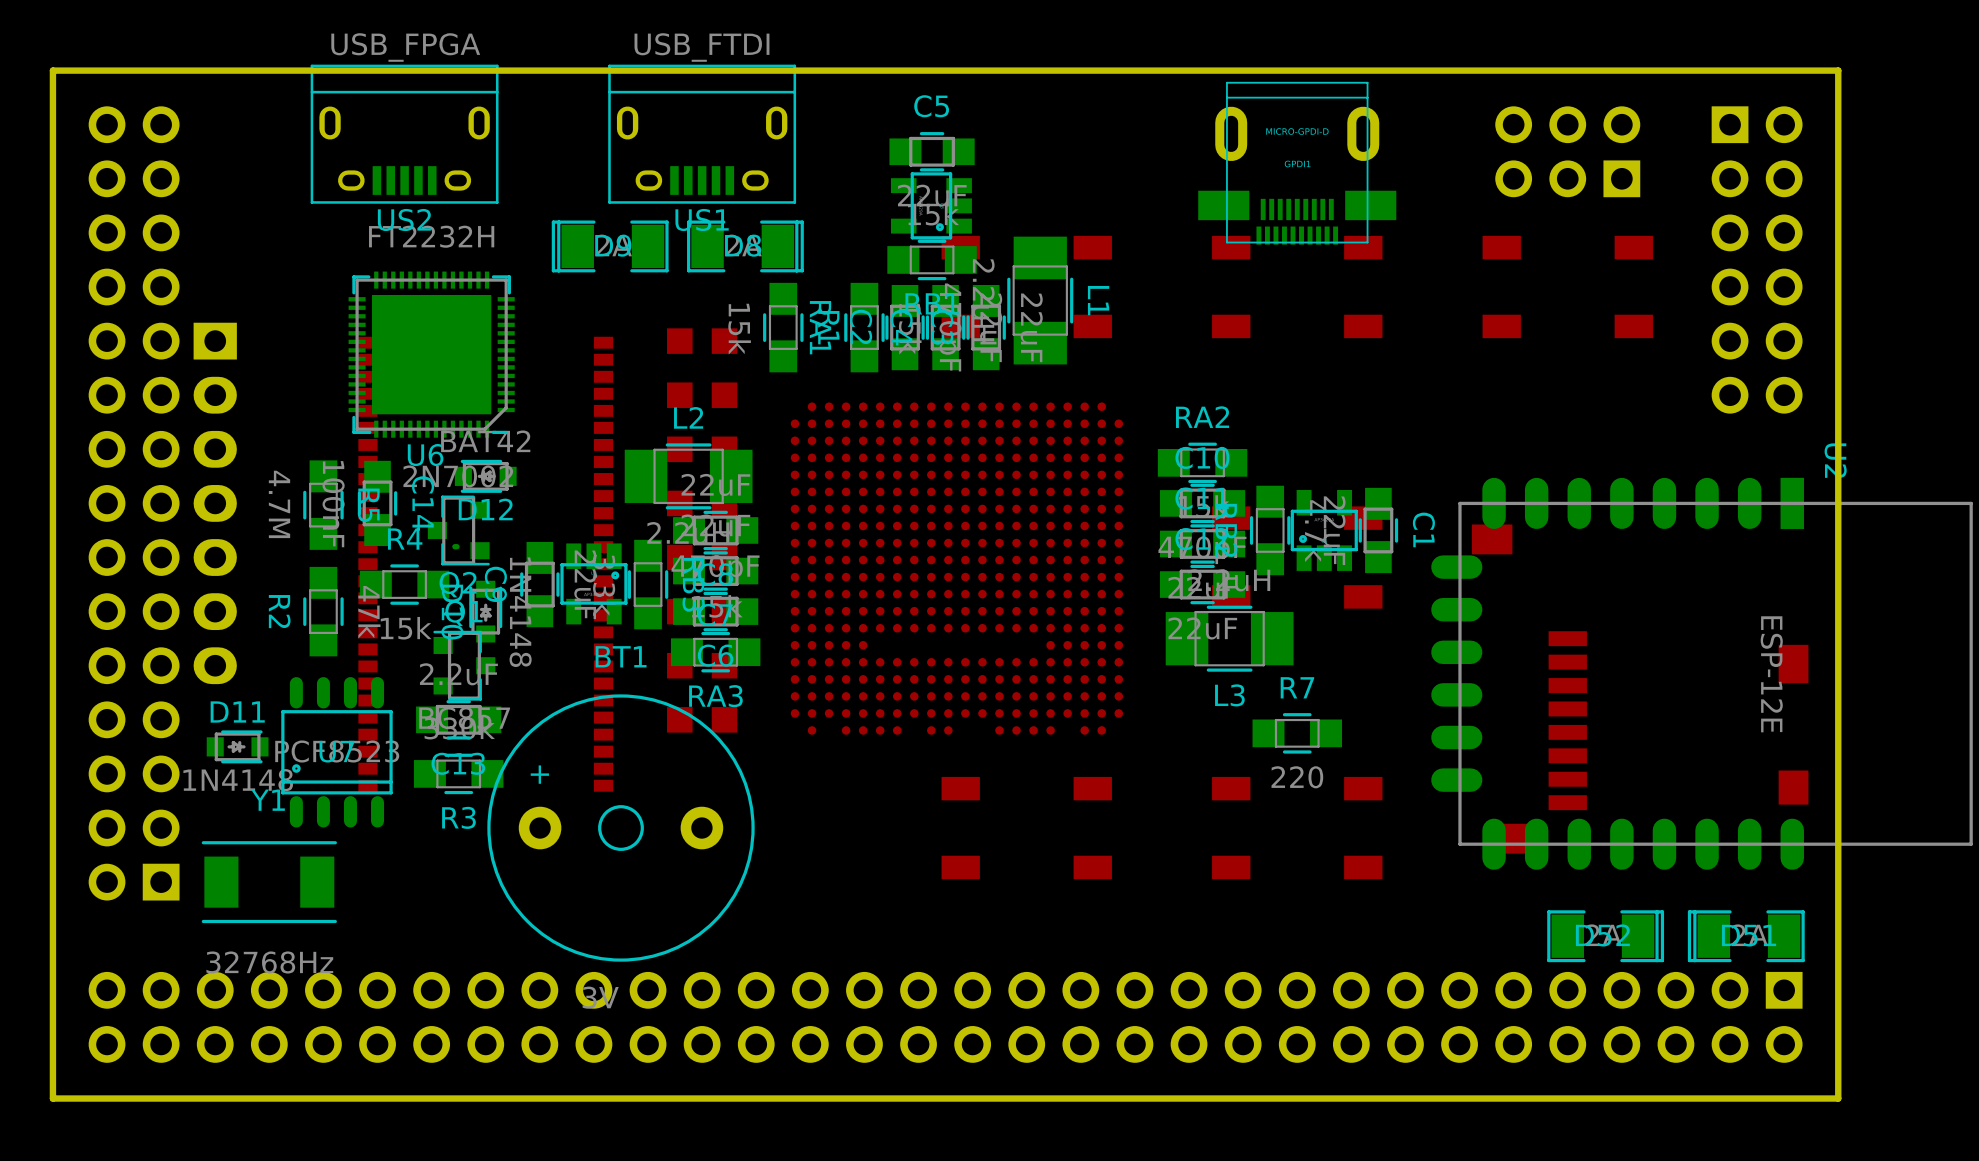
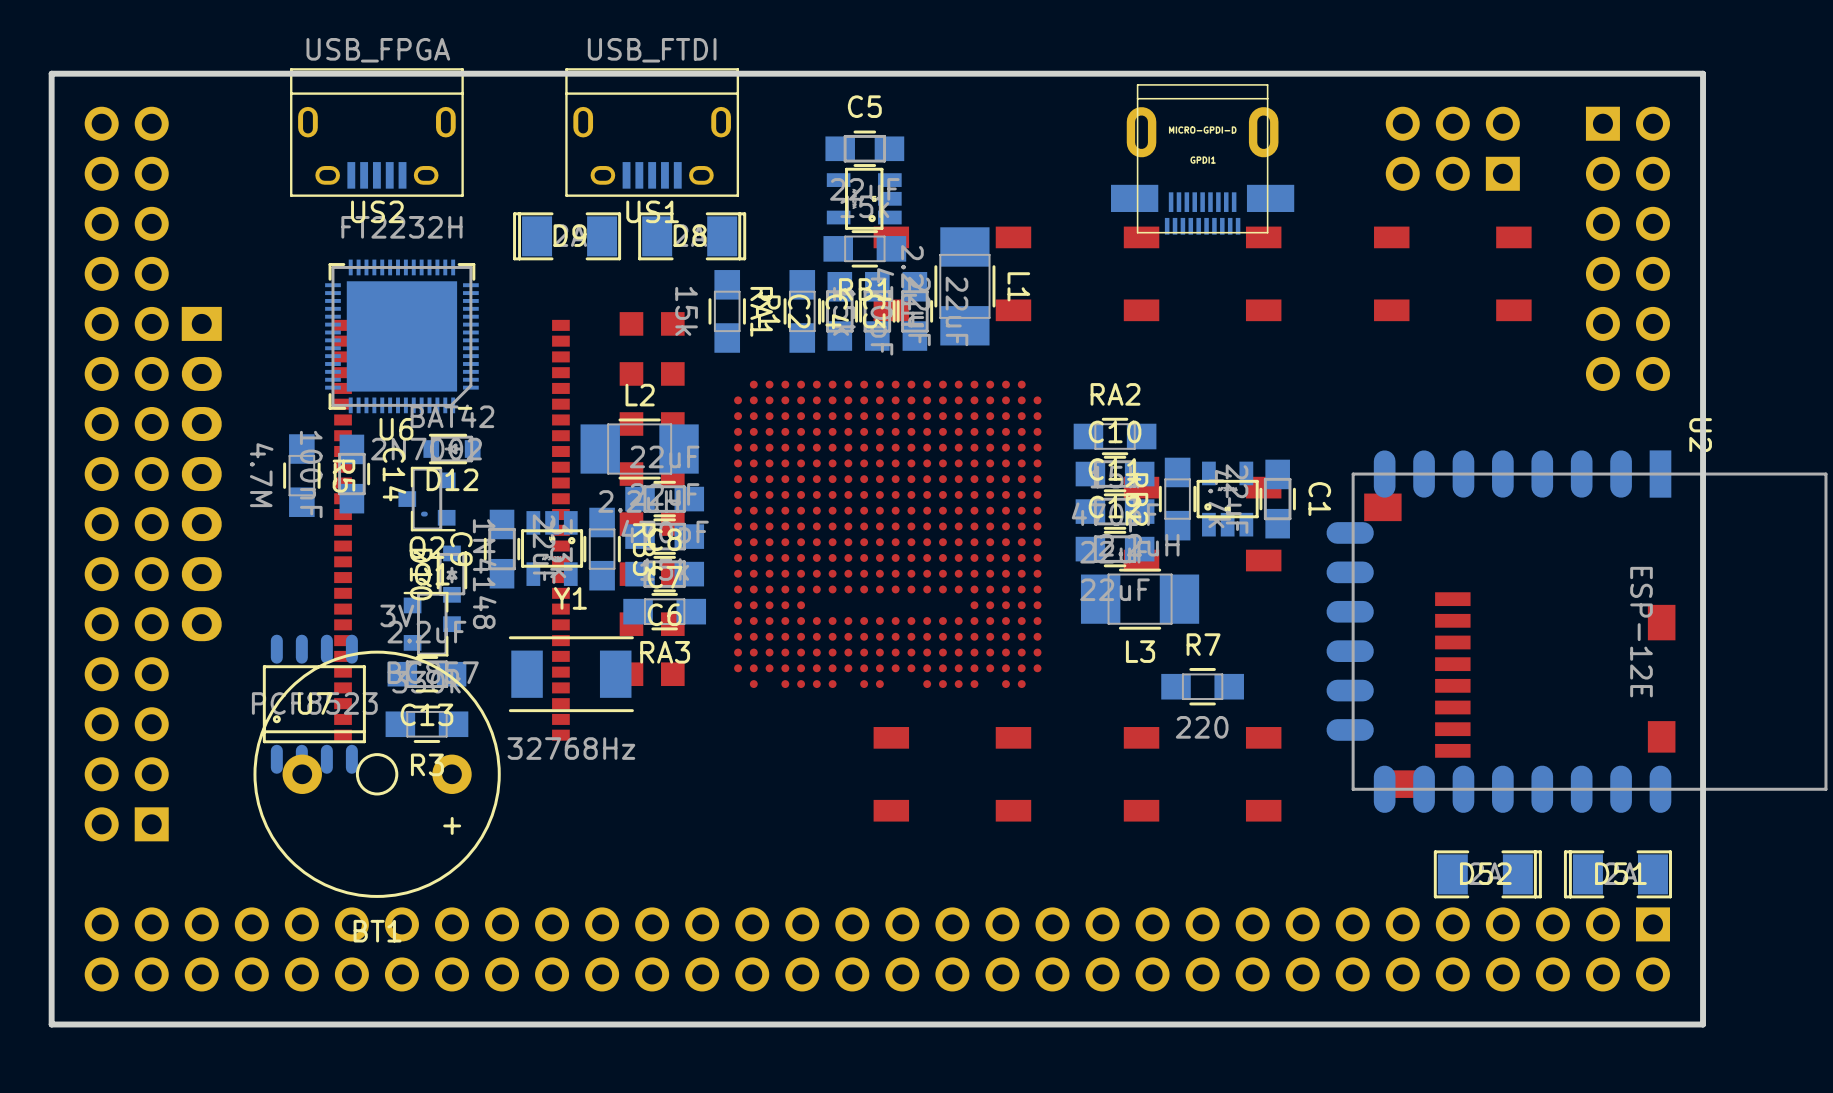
R4: 15k (404, 584) -> none
R2: 47k (323, 611) -> none
D11: 1N4148 (237, 746) -> none
BT1 rotation: 0° (620, 828) -> 180° (377, 774)
BT1 position: (620, 828) -> (377, 774)
Y1 position: (269, 882) -> (571, 674)

